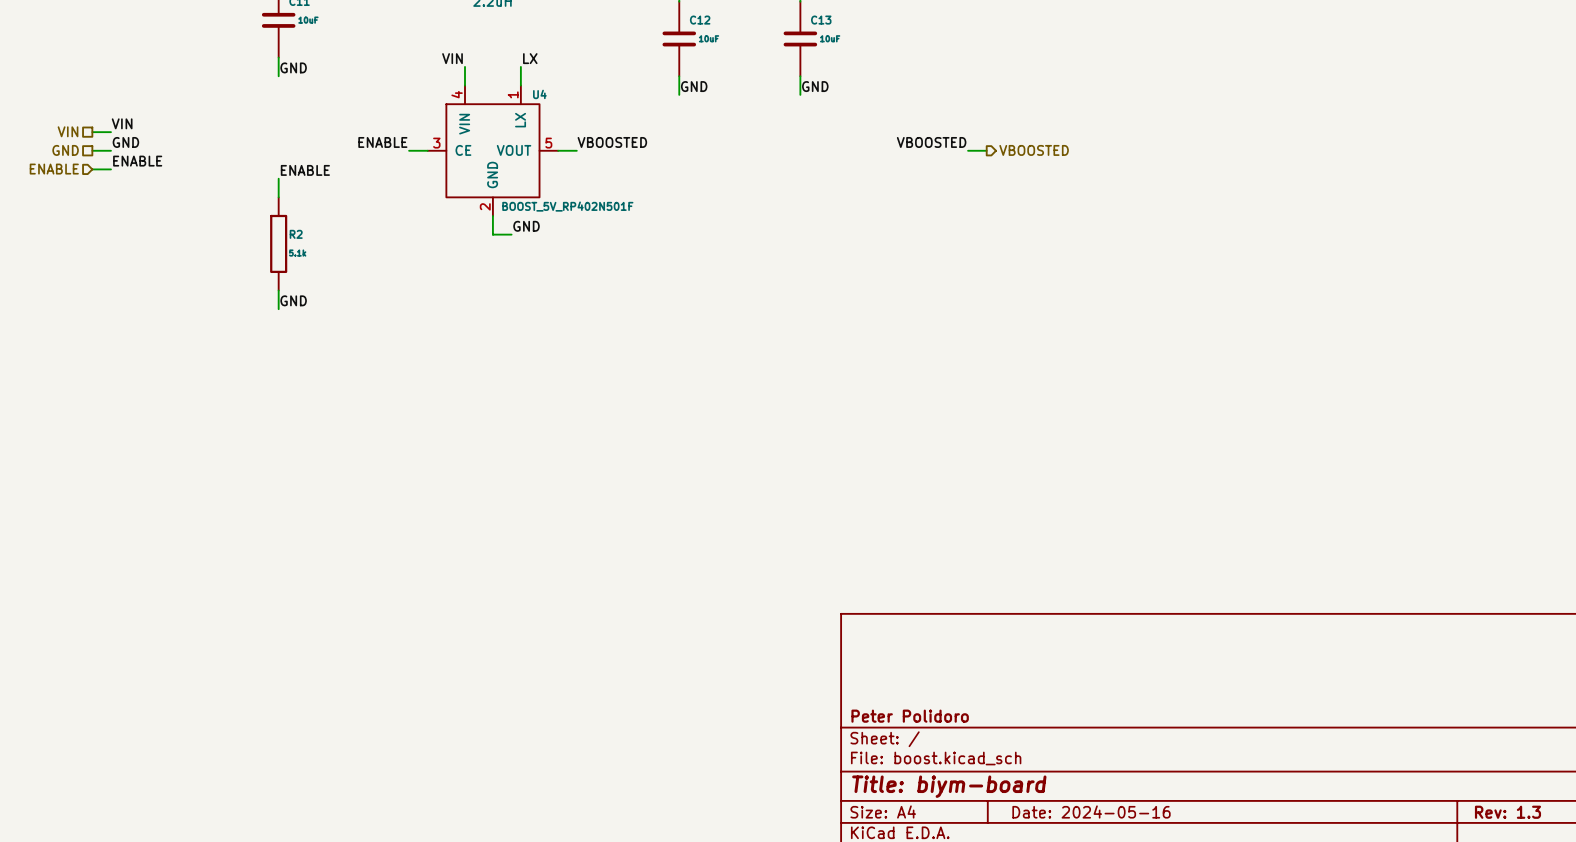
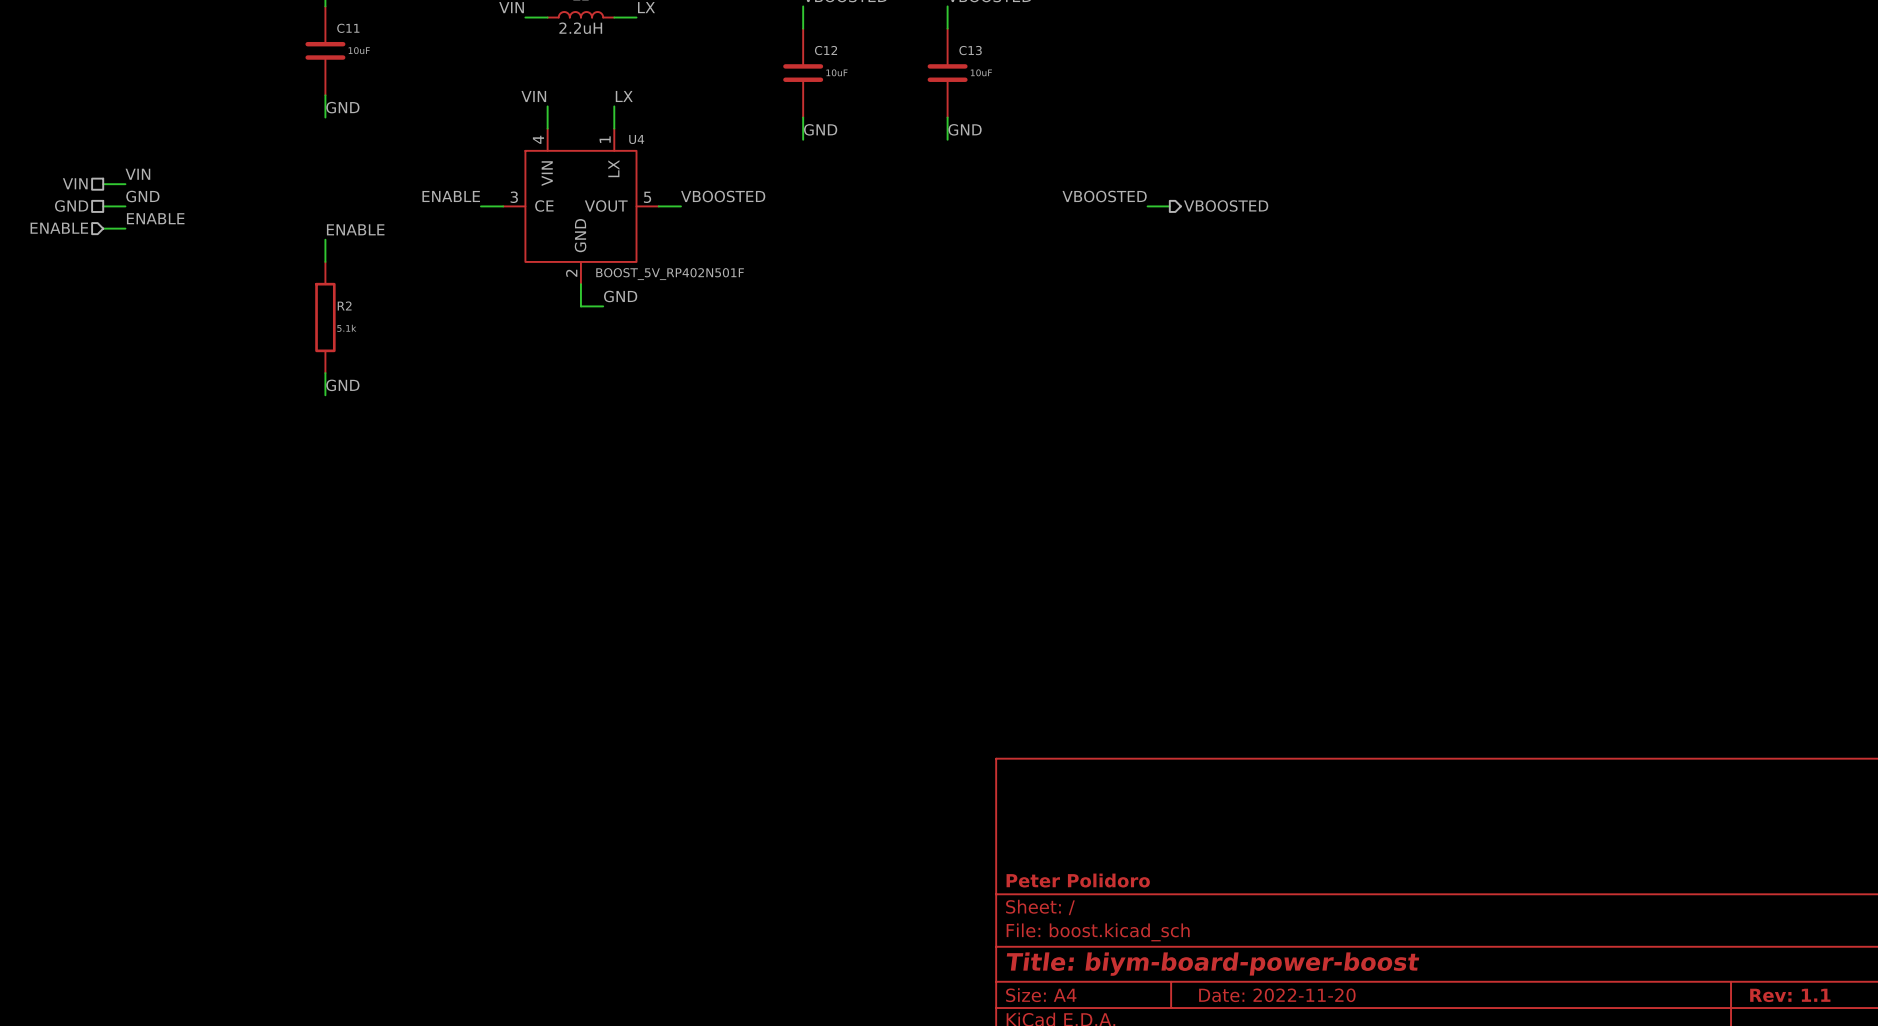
title block: Title: biym-board (949, 786) -> Title: biym-board-power-boost (1212, 964)
title block: Date: 2024-05-16 (1091, 812) -> Date: 2022-11-20 (1277, 995)
title block: Rev: 1.3 (1507, 812) -> Rev: 1.1 (1790, 995)

